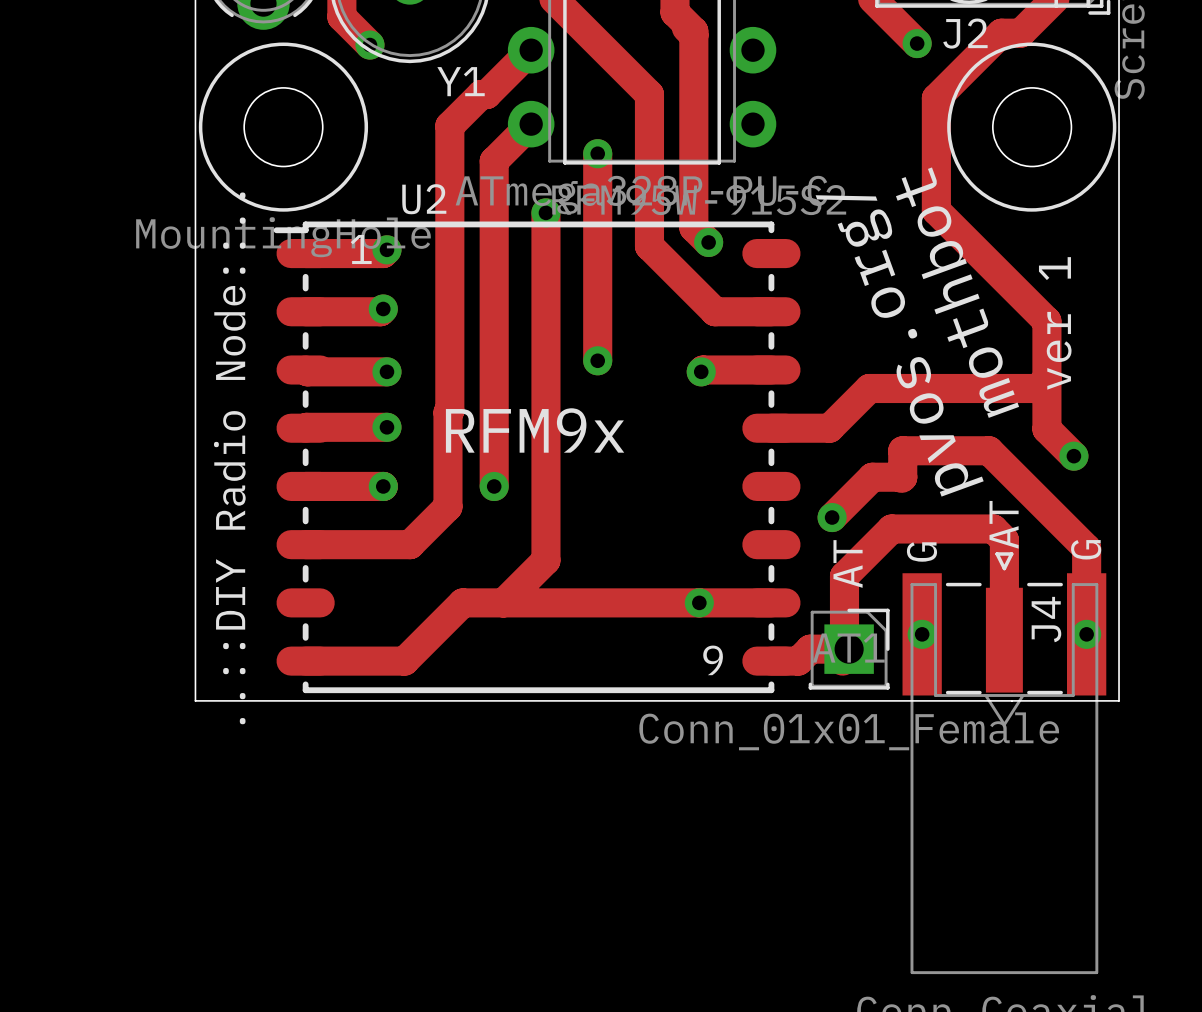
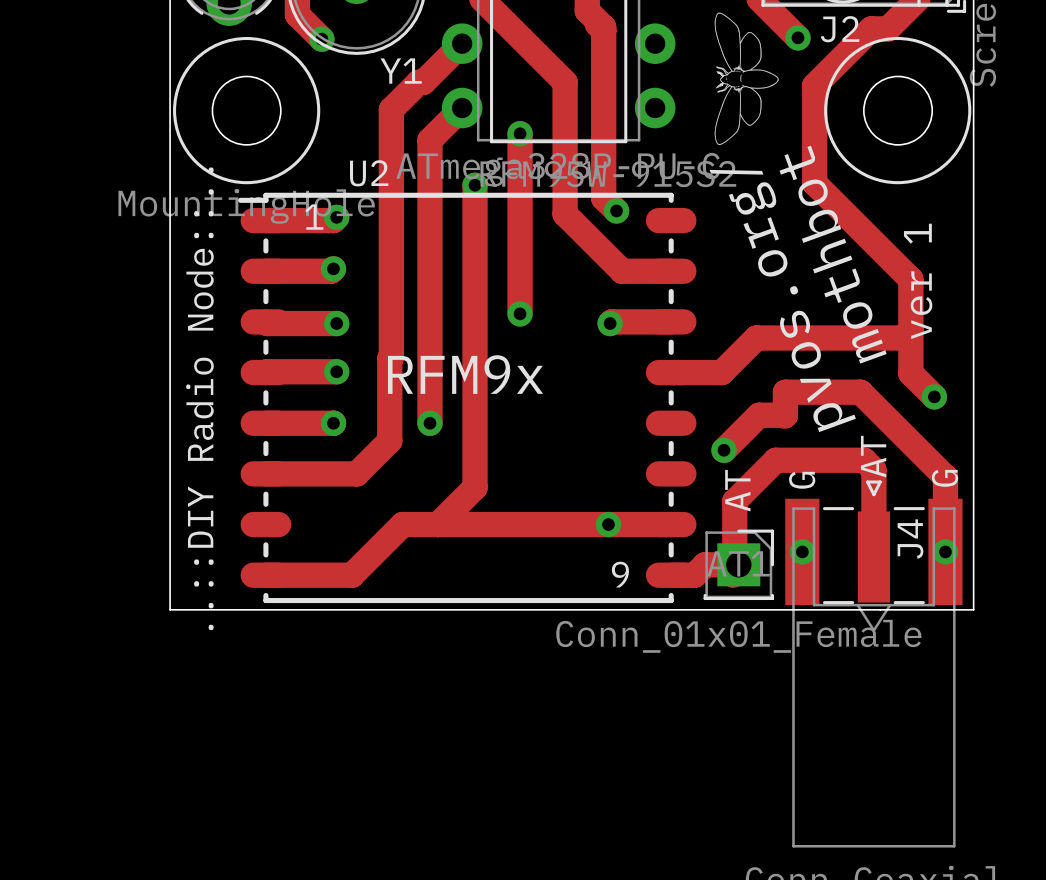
drawing: none -> [714, 12, 779, 145]

